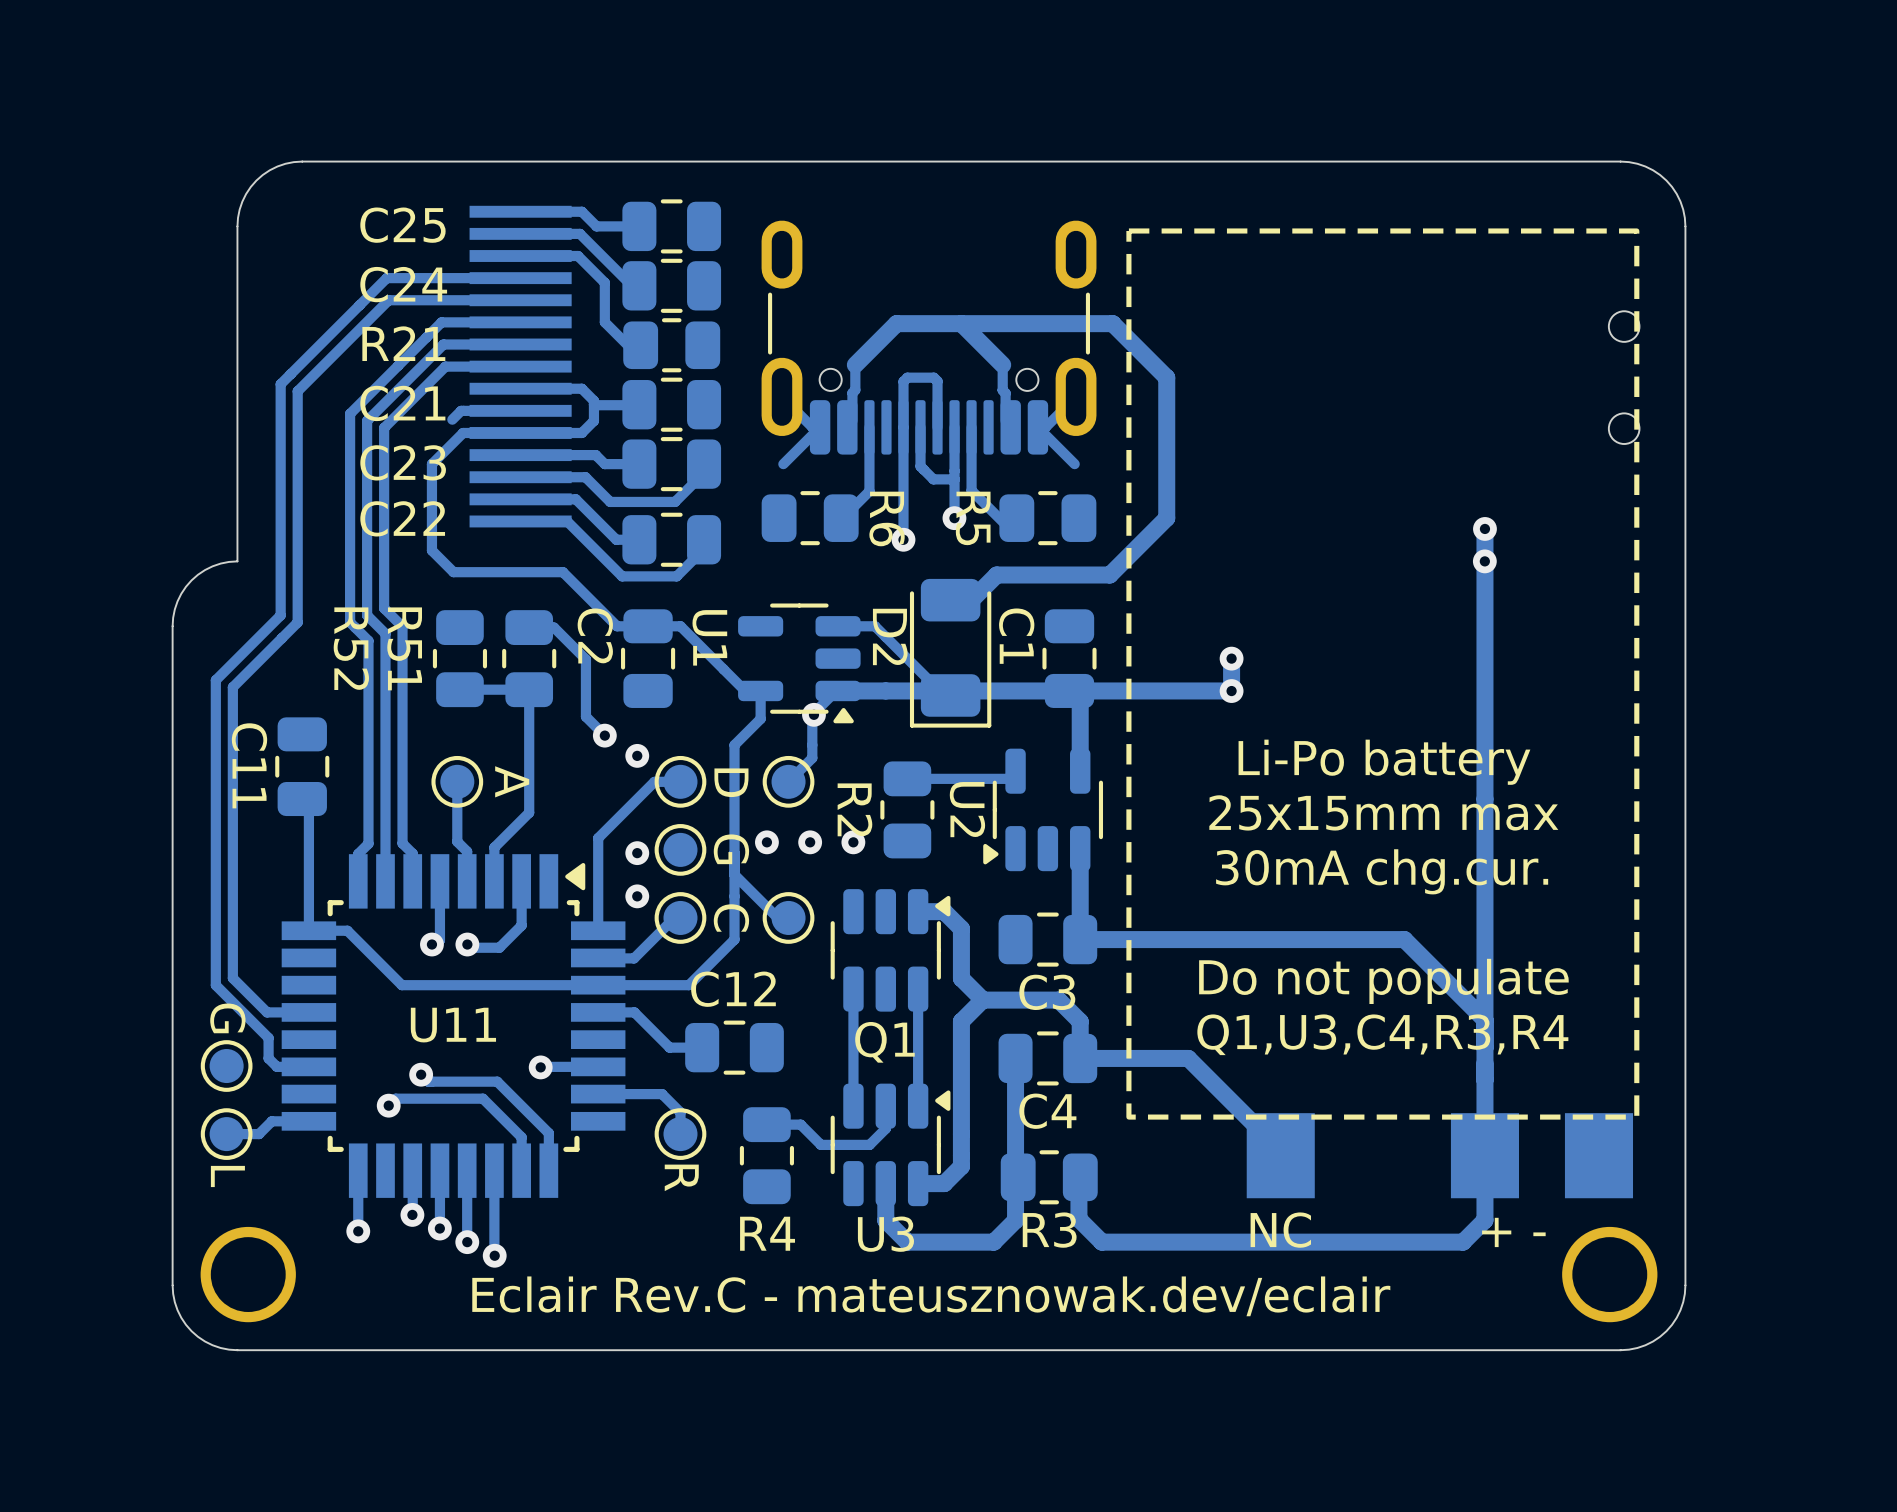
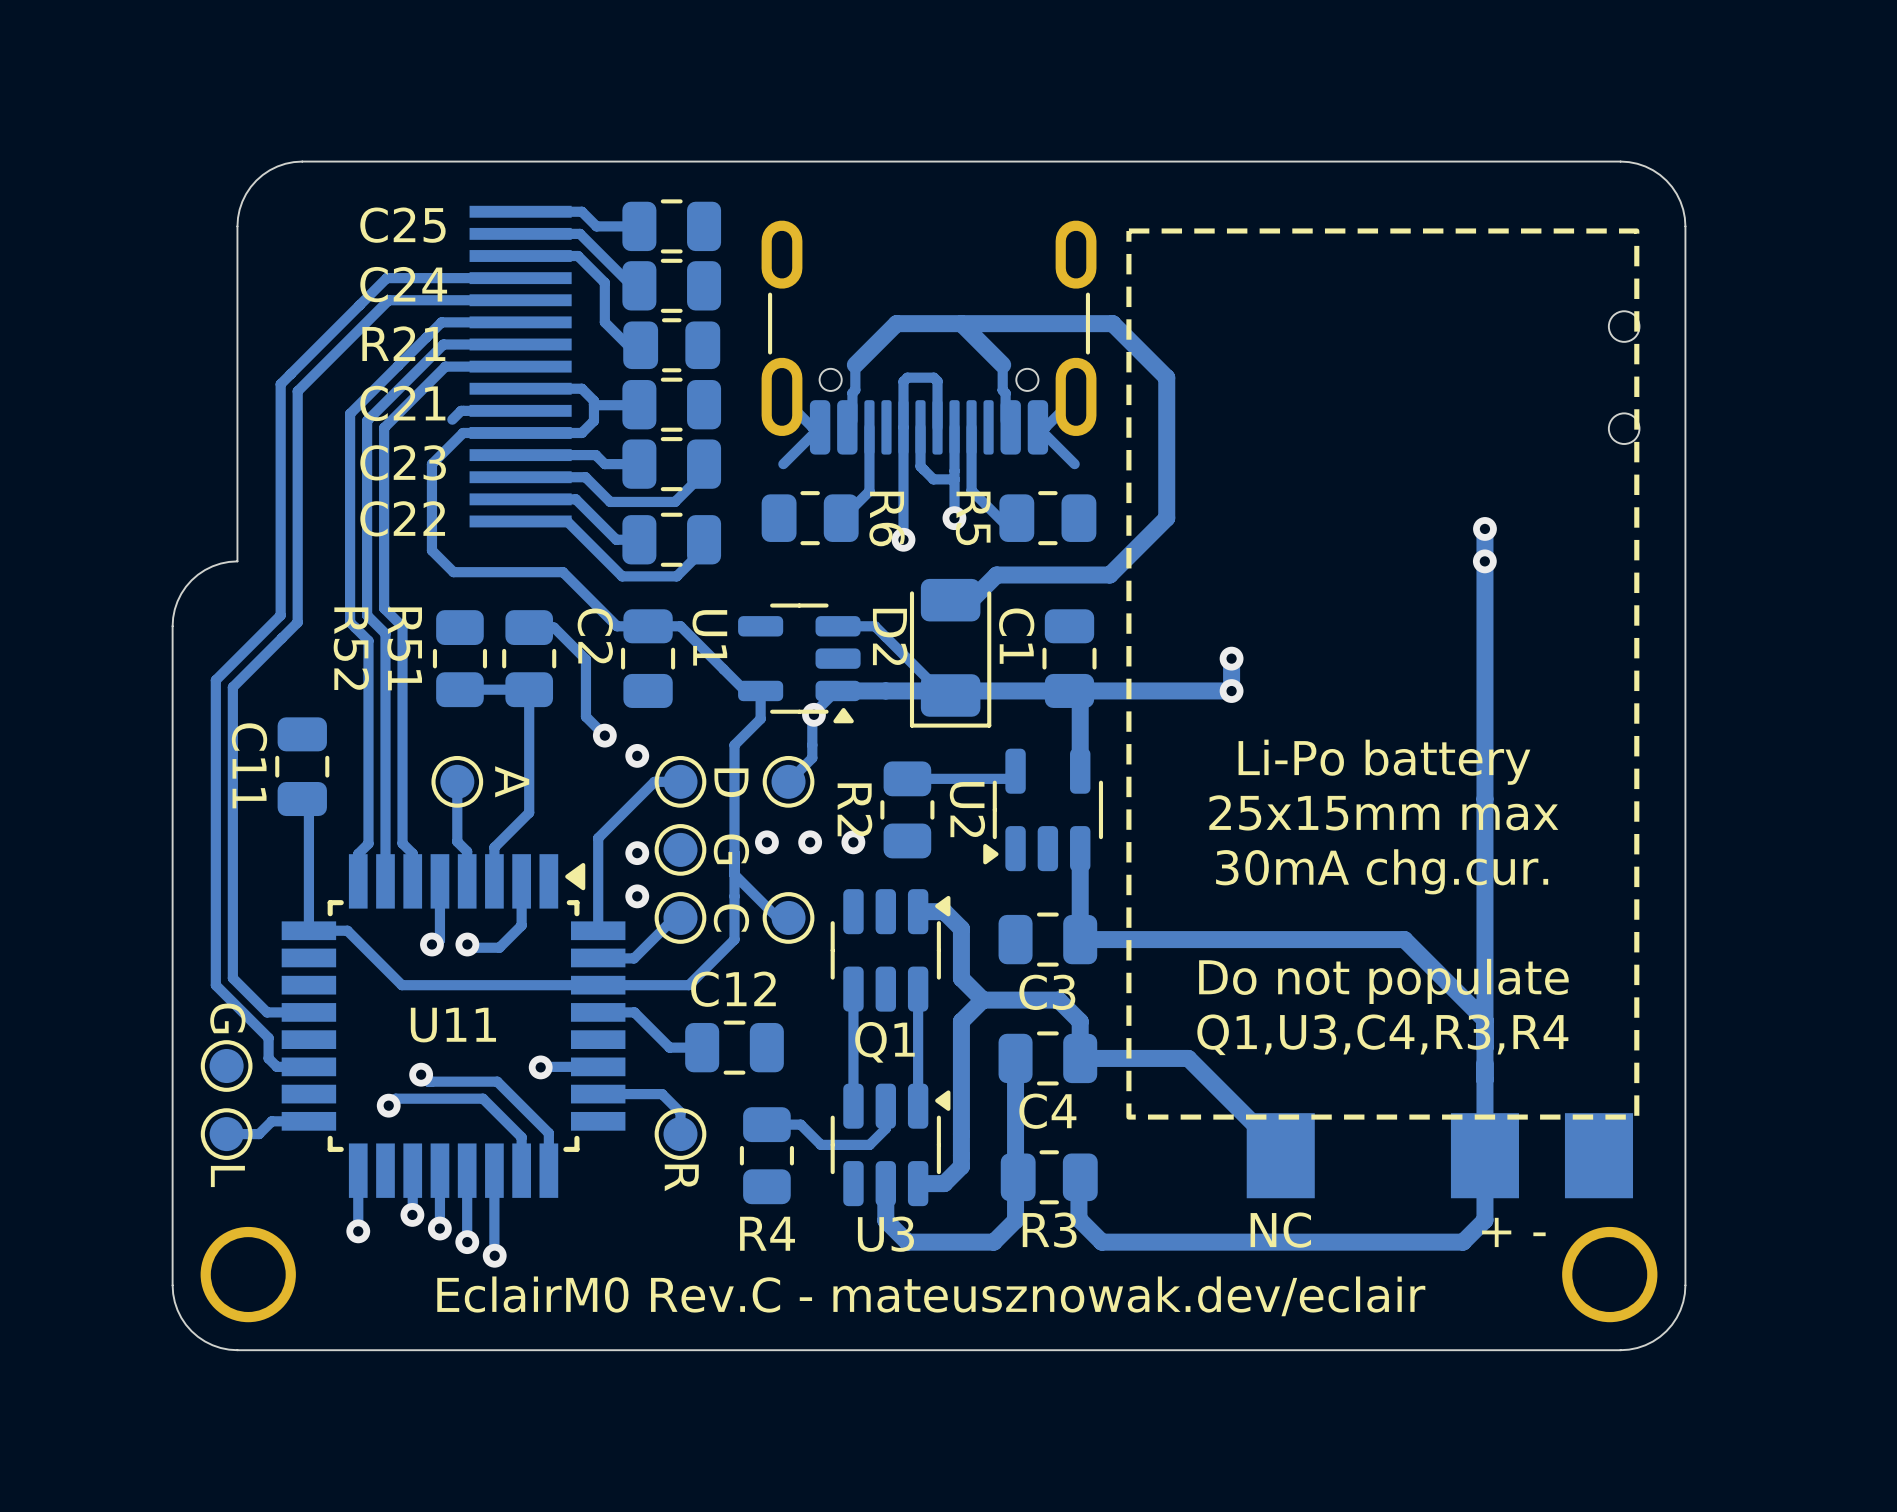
text: Eclair Rev.C - mateusznowak.dev/eclair (931, 1296) -> EclairM0 Rev.C - mateusznowak.dev/eclair (931, 1296)

